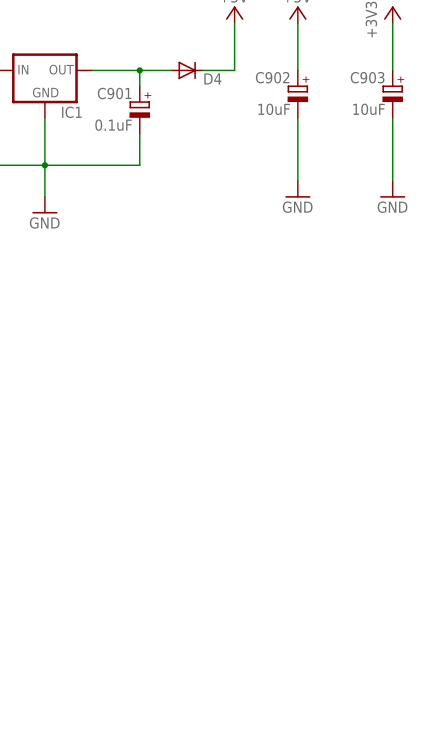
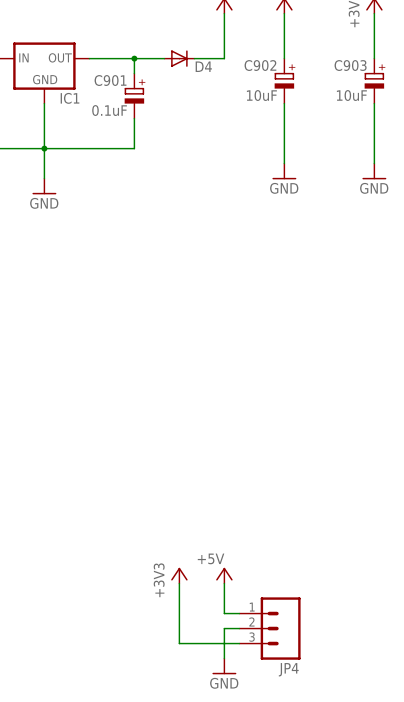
power symbol: none -> +3V3 (179, 575)
power symbol: none -> +5V (224, 575)
wire: none -> (179, 583) (179, 643) (239, 643)
wire: none -> (224, 583) (224, 613) (239, 613)
wire: none -> (239, 628) (224, 628) (224, 658)
JP4: none -> (269, 628)
power symbol: none -> GND (224, 666)

